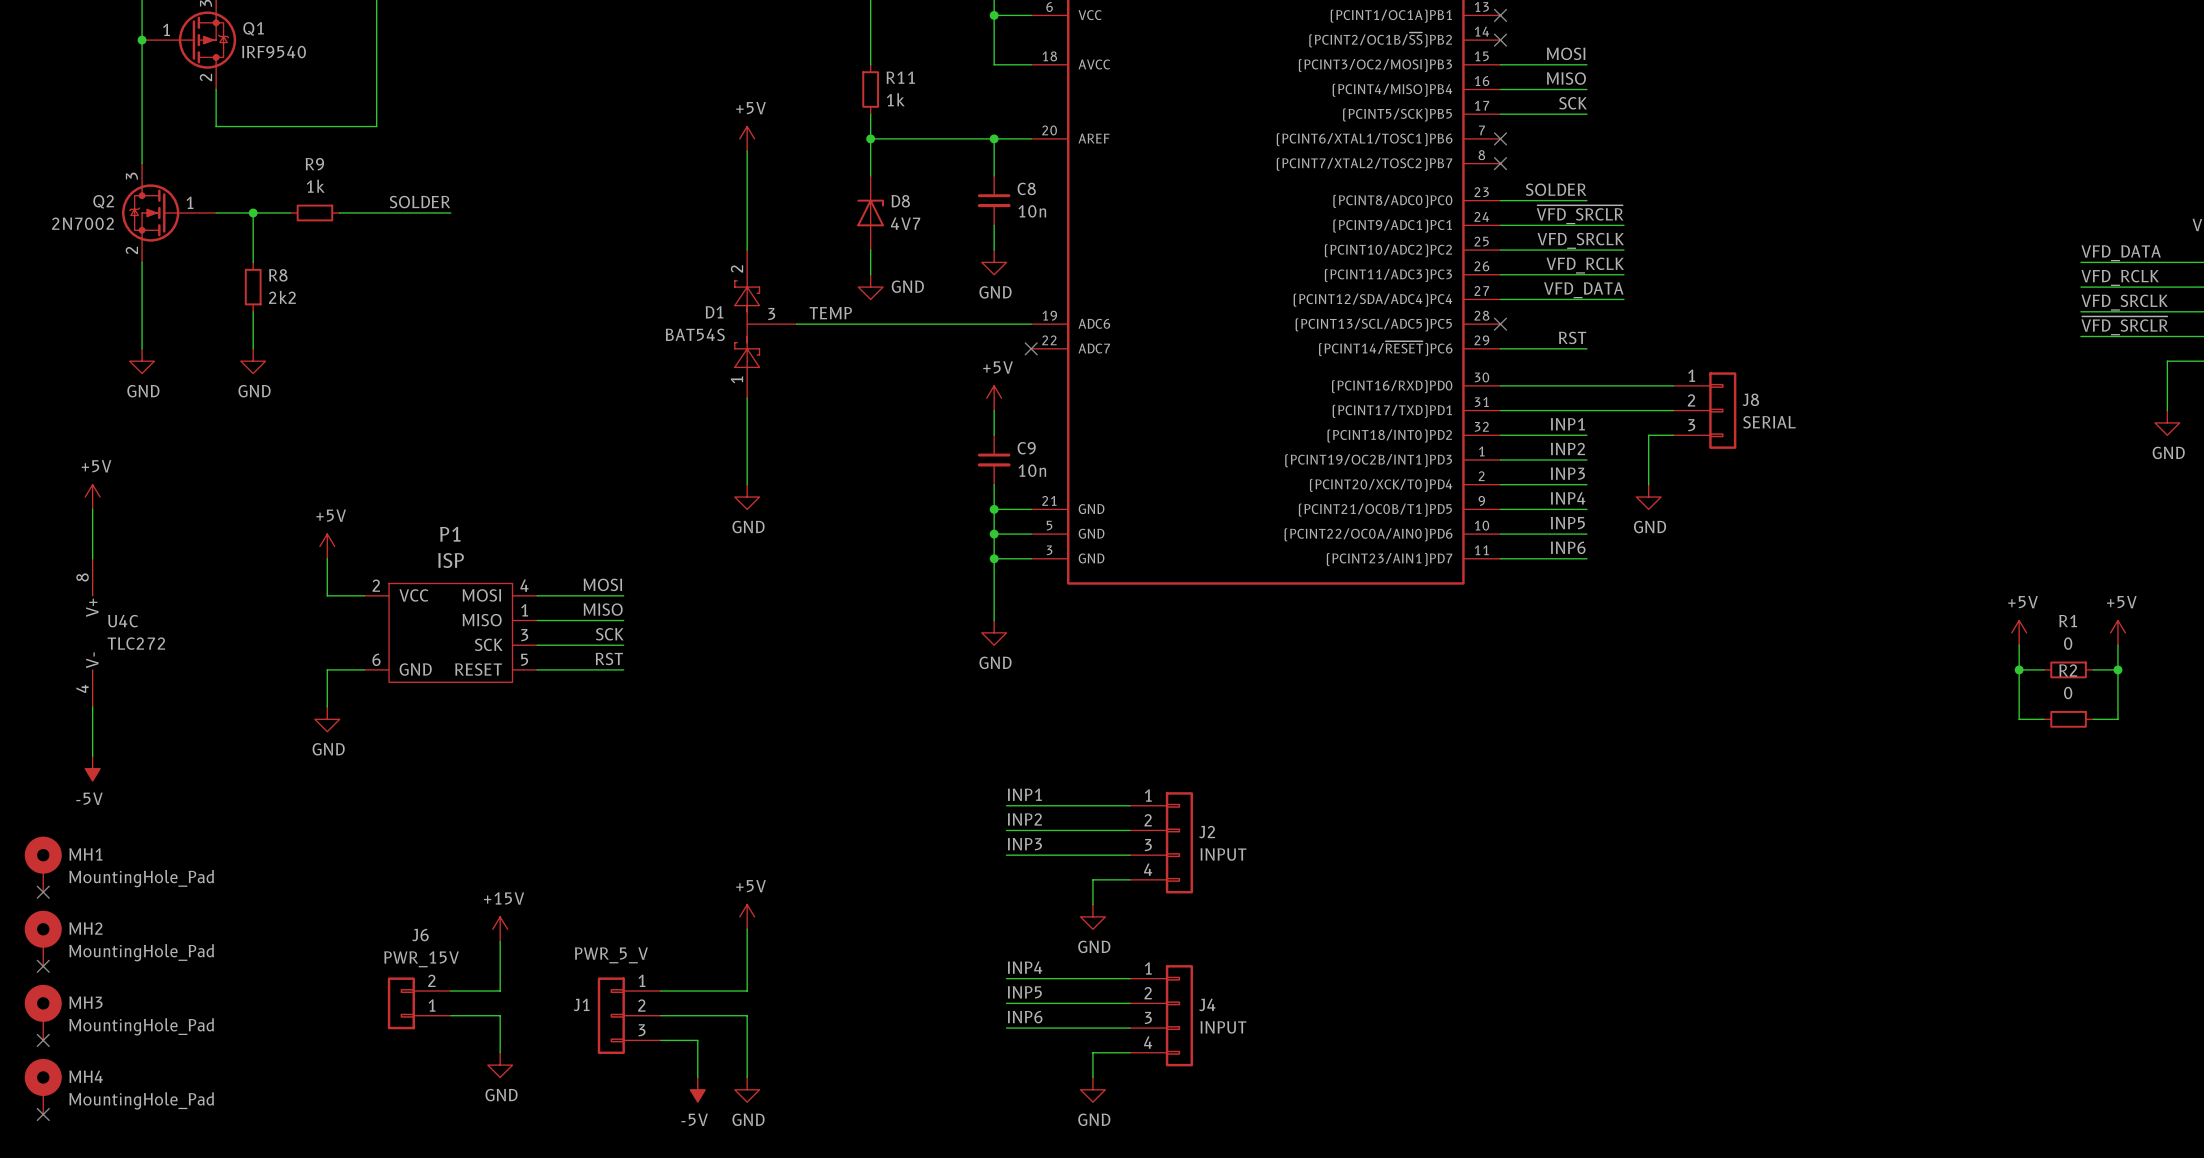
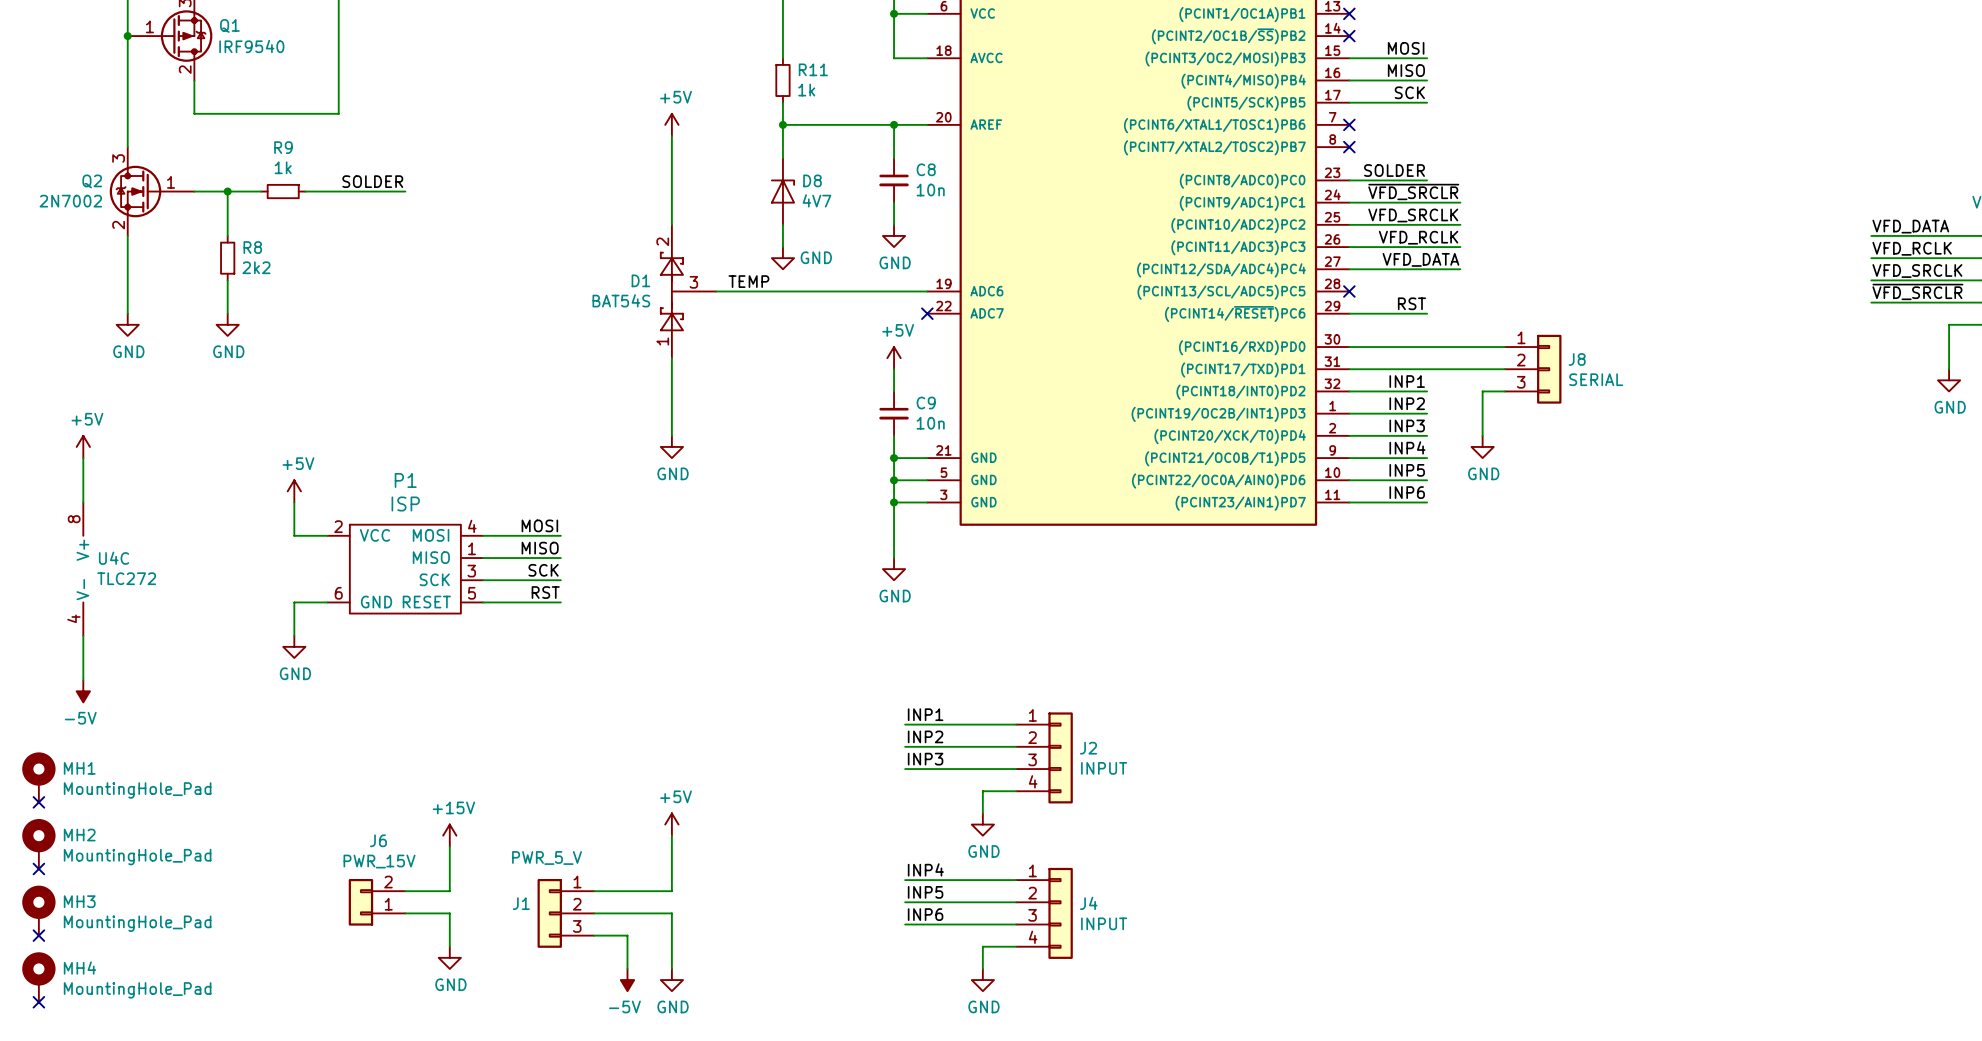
power symbol: +5V (2019, 632) -> none
power symbol: +5V (2117, 632) -> none
wire: (2019, 645) (2019, 719) (2043, 719) -> none
wire: (2117, 645) (2117, 719) (2093, 719) -> none
wire: (2019, 669) (2043, 669) -> none
junction: (2019, 669) -> none
R1: 0 (2068, 669) -> none
wire: (2093, 669) (2117, 669) -> none
junction: (2117, 669) -> none
R2: 0 (2068, 719) -> none

